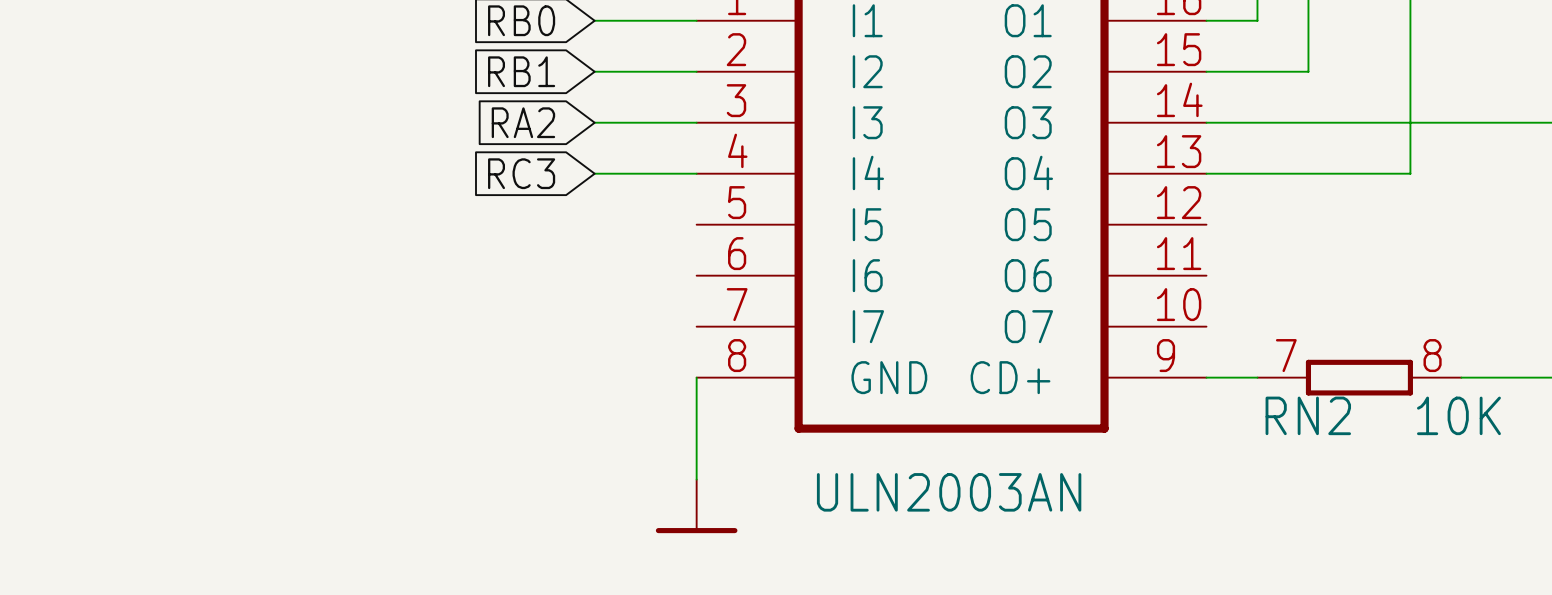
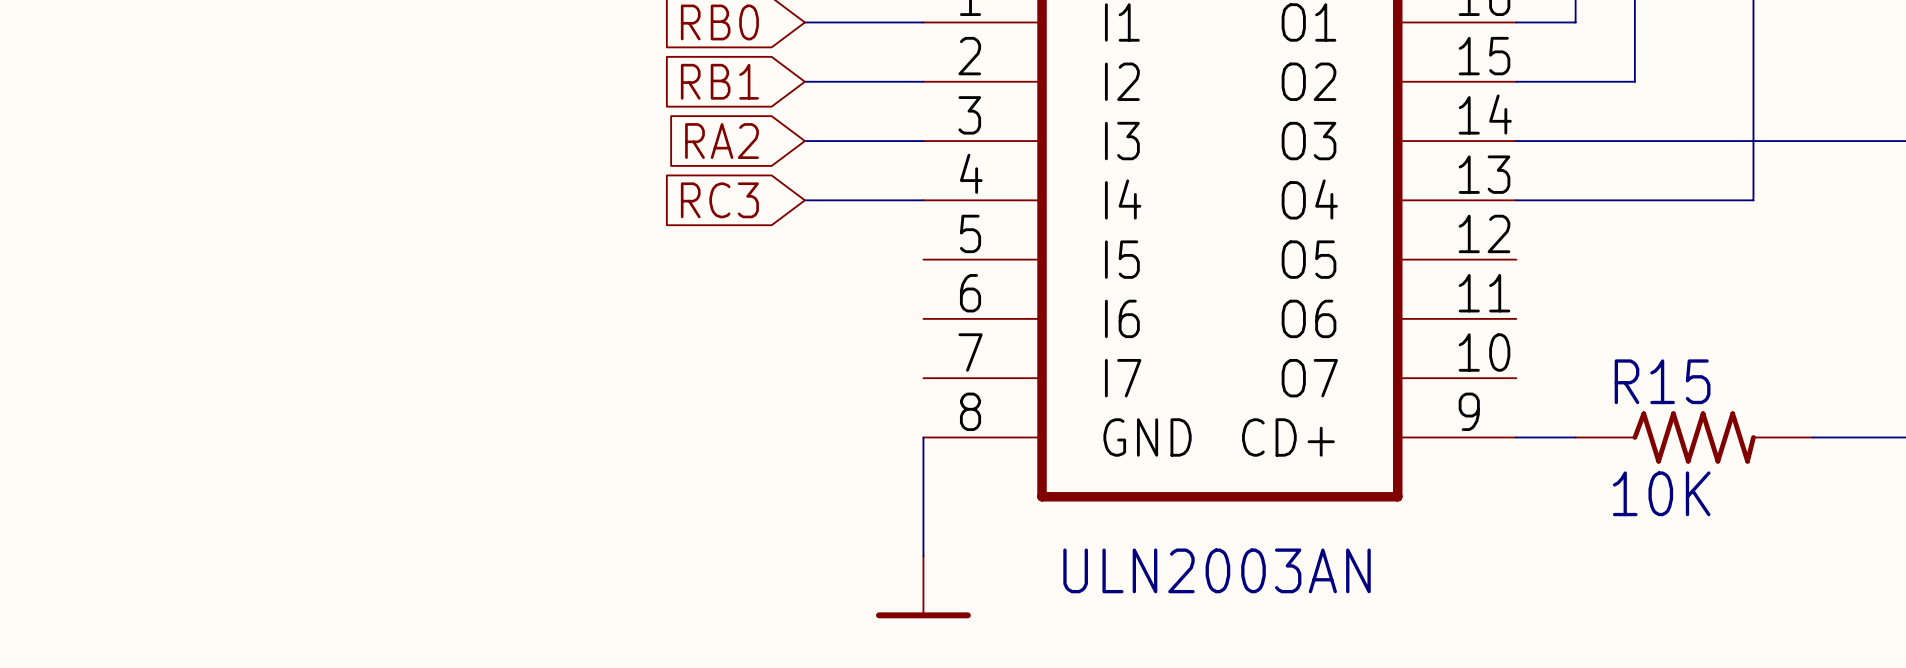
RN2: 10K (1359, 377) -> none
R15: none -> 10K (1694, 437)

